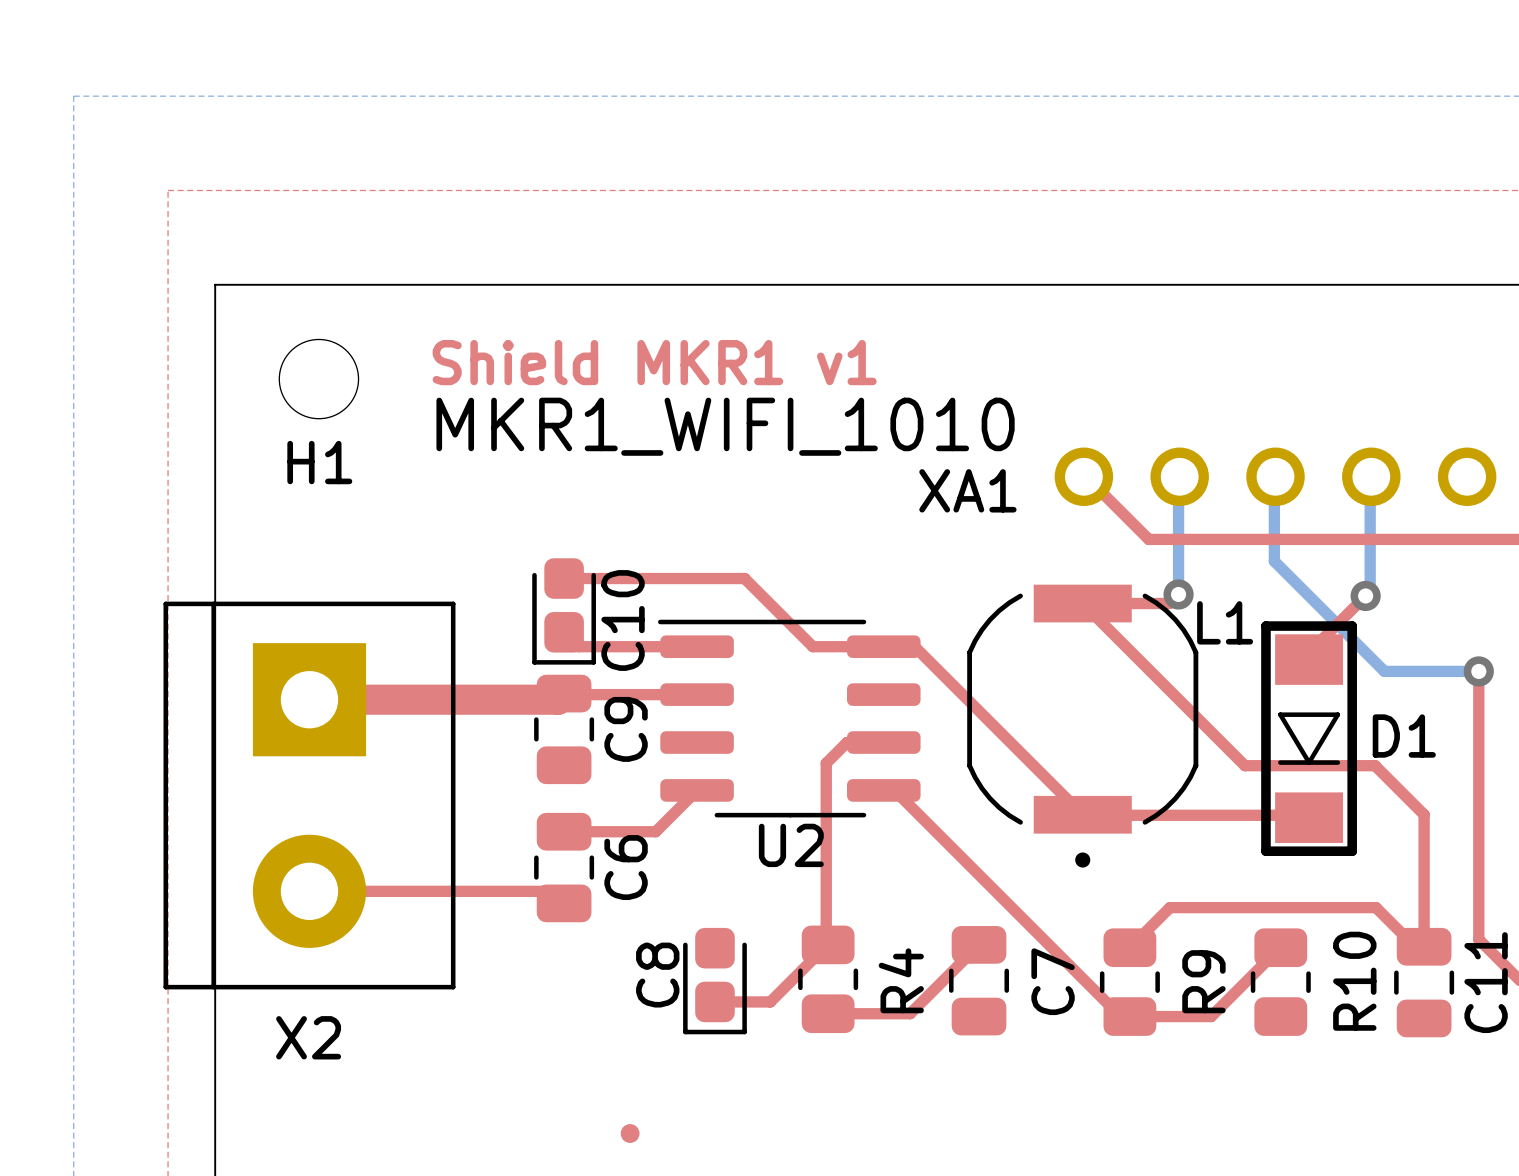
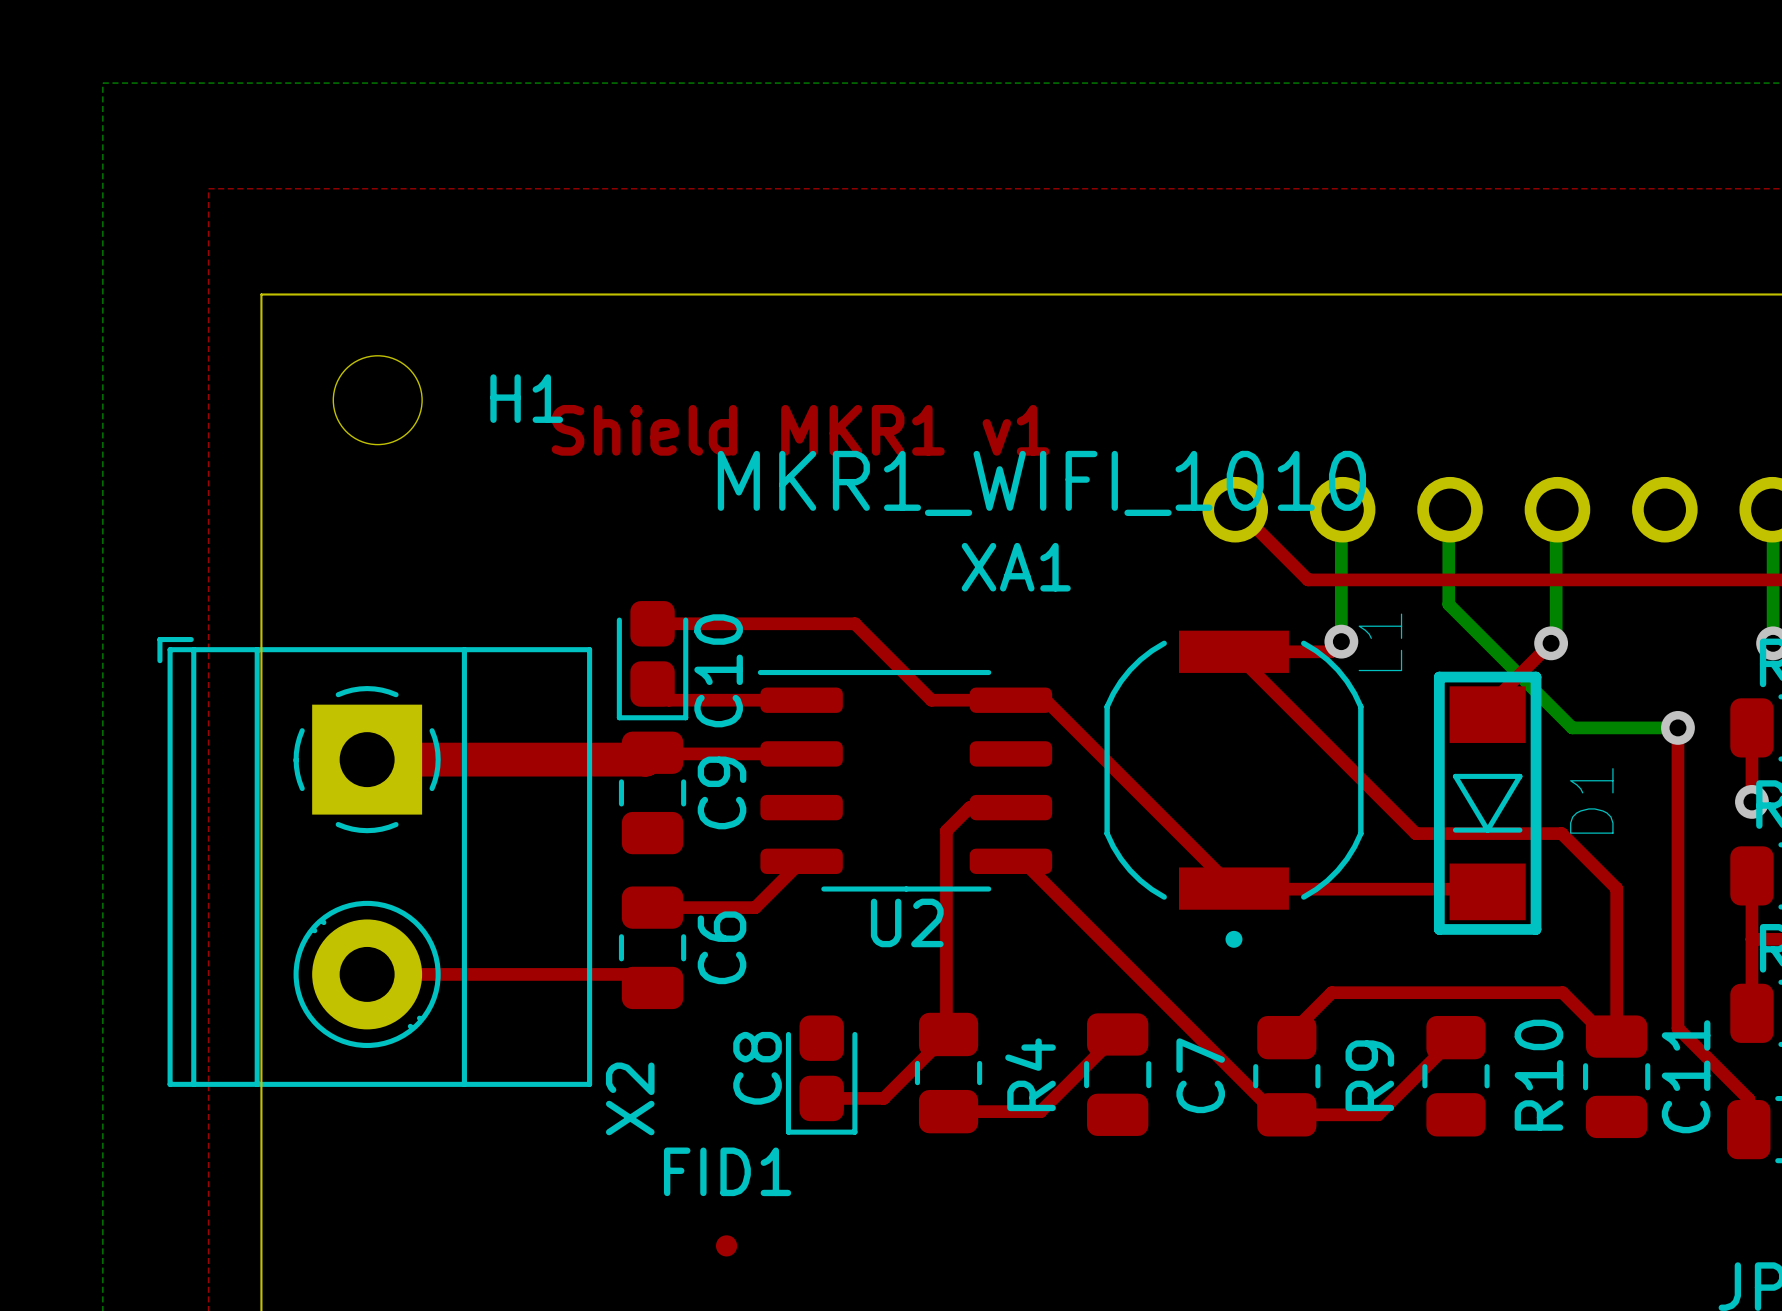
text position: Shield MKR1 v1 (654, 362) -> Shield MKR1 v1 (800, 430)
XA1 value position: MKR1_WIFI_1010 (725, 426) -> MKR1_WIFI_1010 (1041, 483)
H1 name position: H1 (319, 462) -> H1 (526, 398)
XA1 name position: XA1 (967, 490) -> XA1 (1016, 567)
X2 footprint: [163, 601, 456, 990] -> [157, 636, 593, 1087]
L1 name rotation: 0° (1225, 622) -> 90° counterclockwise (1380, 642)
D1 name rotation: 0° (1404, 736) -> 90° counterclockwise (1591, 800)
X2 name position: X2 (308, 1037) -> X2 (630, 1098)
FID1 name: none -> FID1 (727, 1171)

